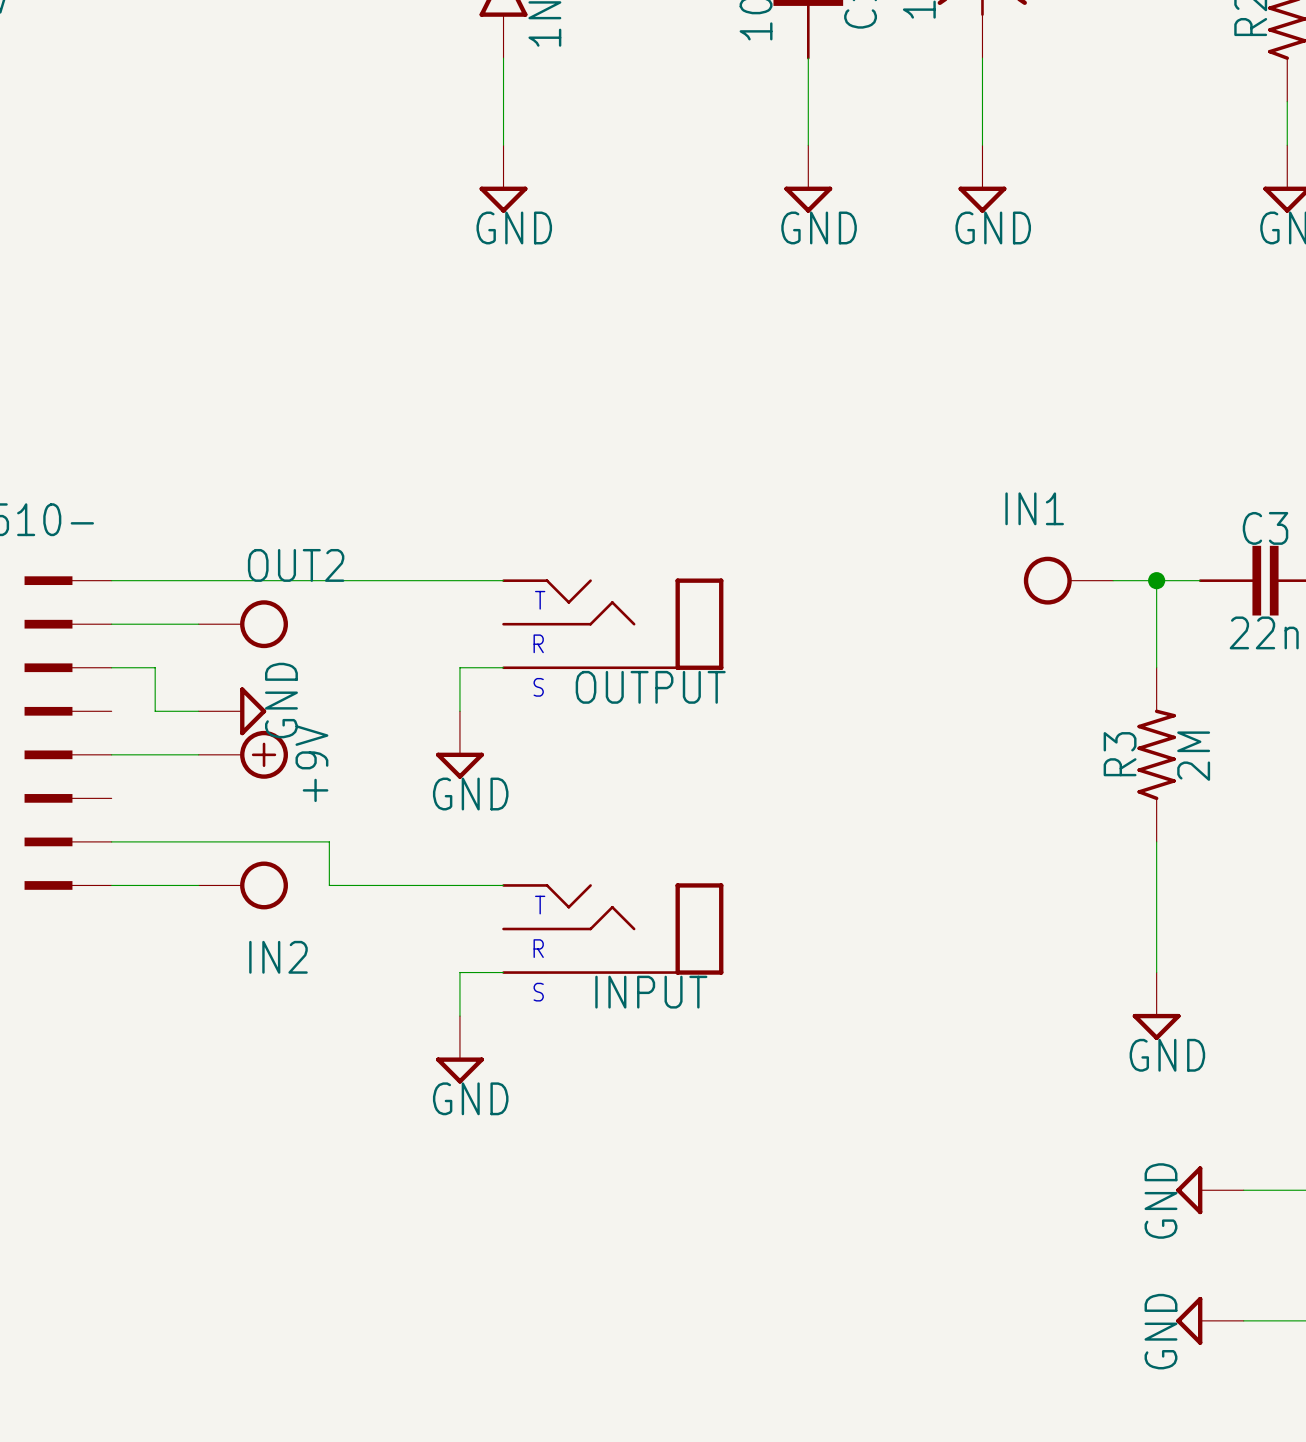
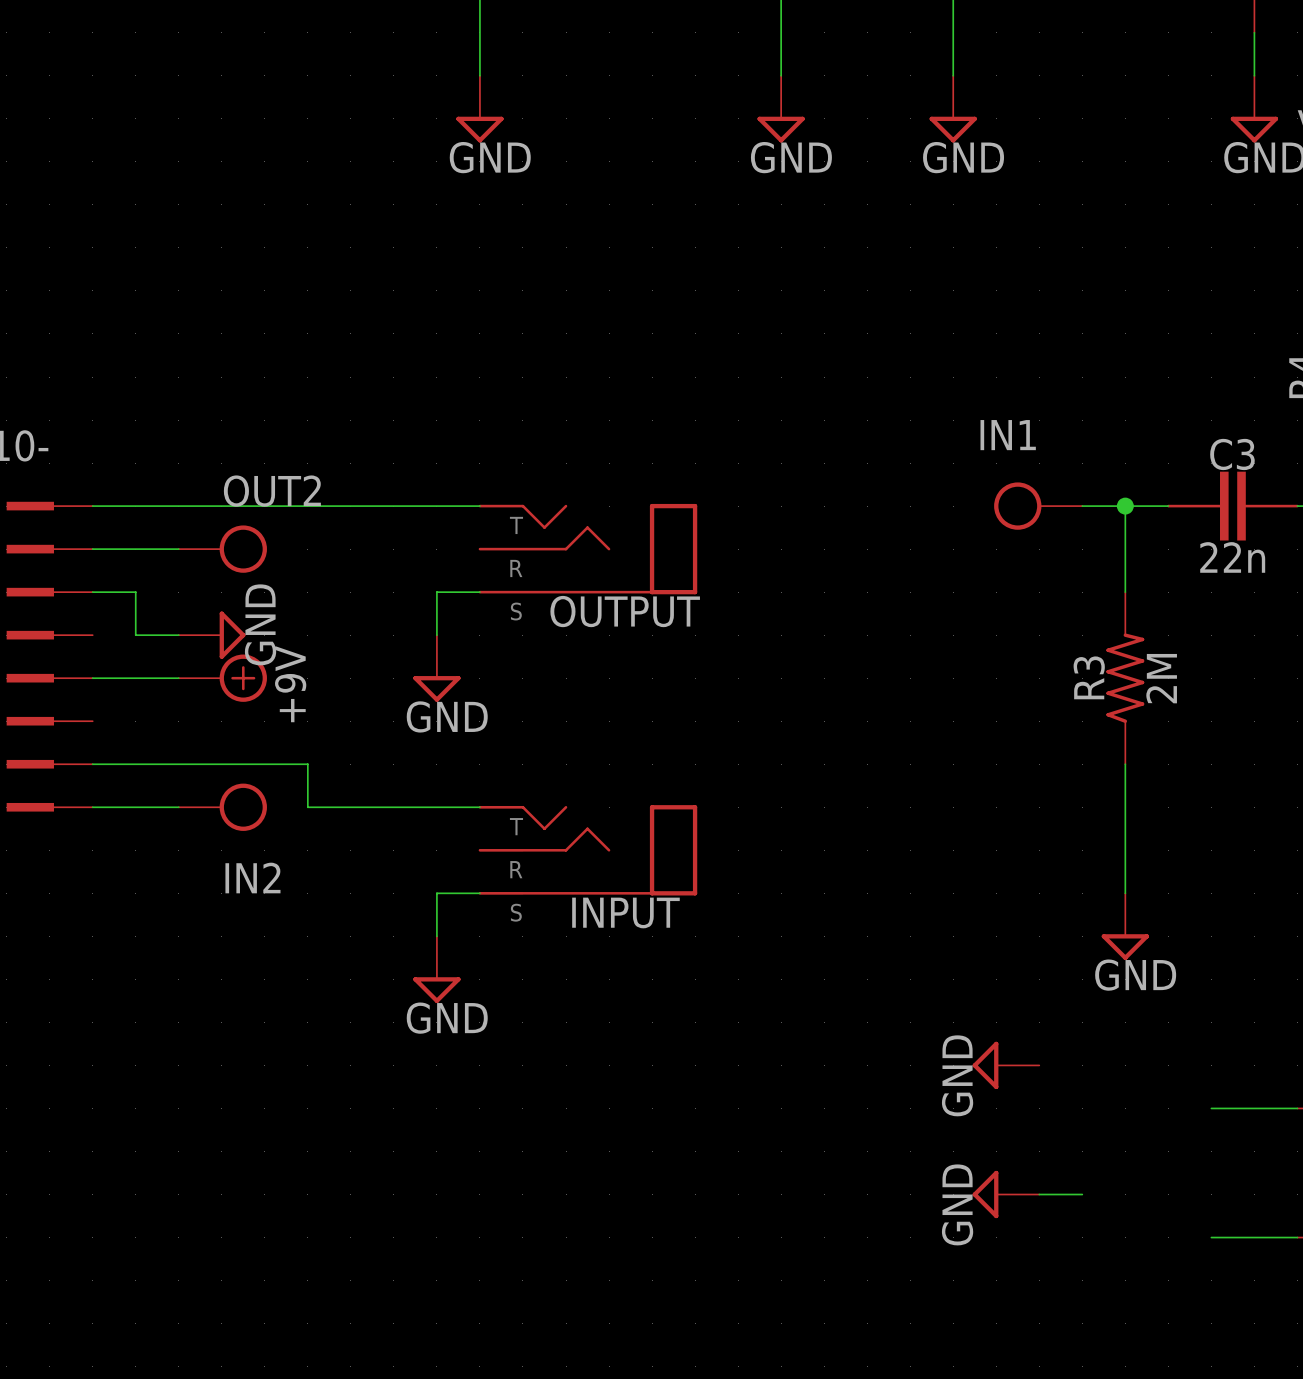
power symbol: none -> GND (1005, 1065)
power symbol: GND (1209, 1190) -> none
power symbol: none -> GND (1005, 1194)
wire: none -> (1039, 1194) (1082, 1194)
power symbol: GND (1209, 1320) -> none

